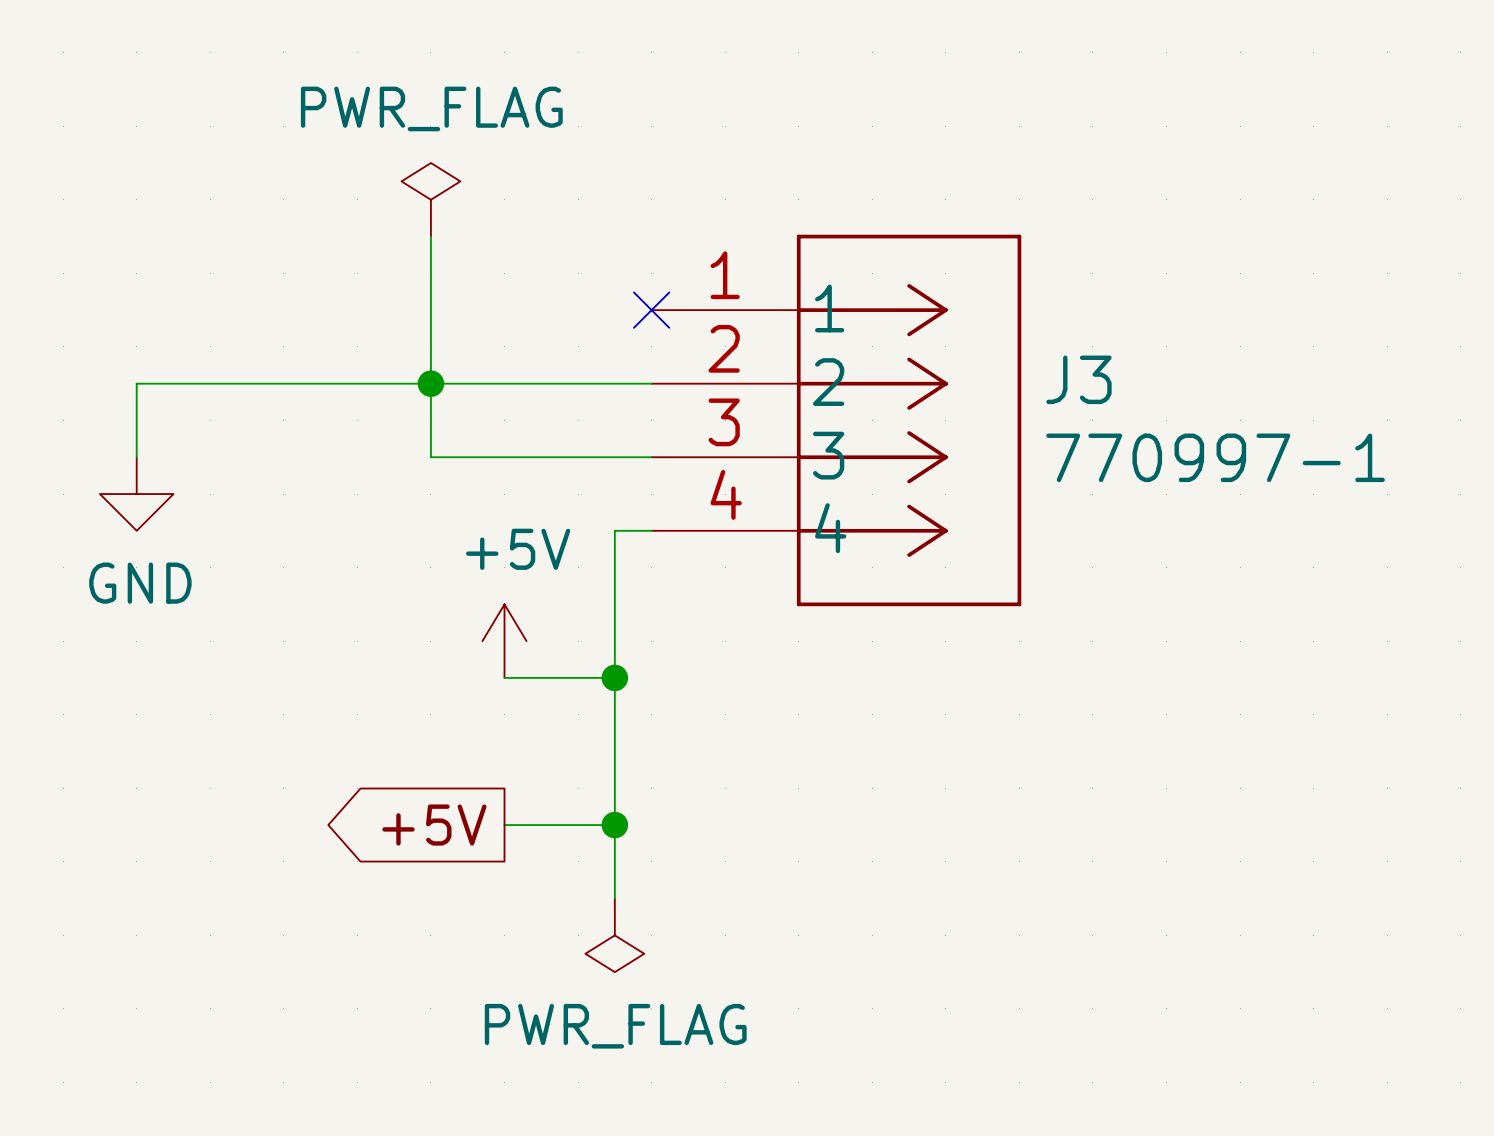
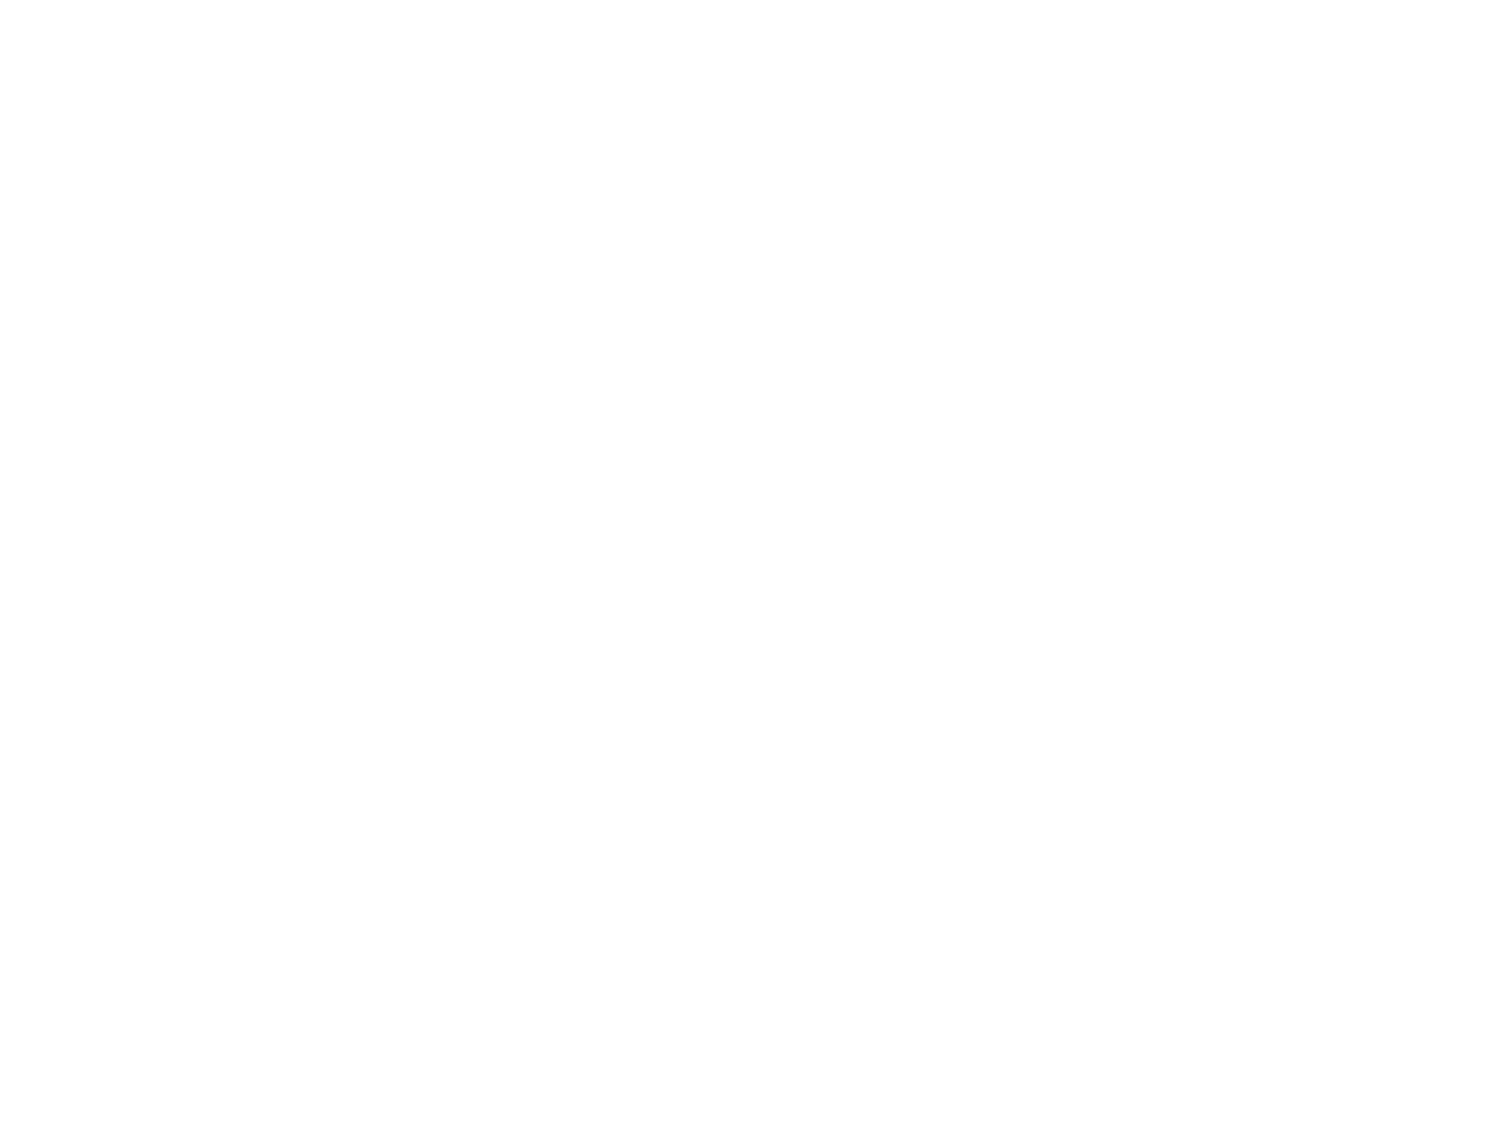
power symbol: PWR_FLAG (430, 199) -> none
wire: (430, 236) (430, 457) (651, 457) -> none
no-connect mark: (651, 310) -> none
junction: (430, 383) -> none
wire: (651, 383) (136, 383) (136, 457) -> none
J3: 770997-1 (836, 420) -> none
power symbol: GND (136, 494) -> none
wire: (651, 530) (614, 530) (614, 898) -> none
power symbol: +5V (504, 641) -> none
wire: (504, 677) (614, 677) -> none
junction: (614, 677) -> none
global label: +5V (434, 825) -> none
wire: (504, 825) (614, 825) -> none
junction: (614, 825) -> none
power symbol: PWR_FLAG (614, 935) -> none

